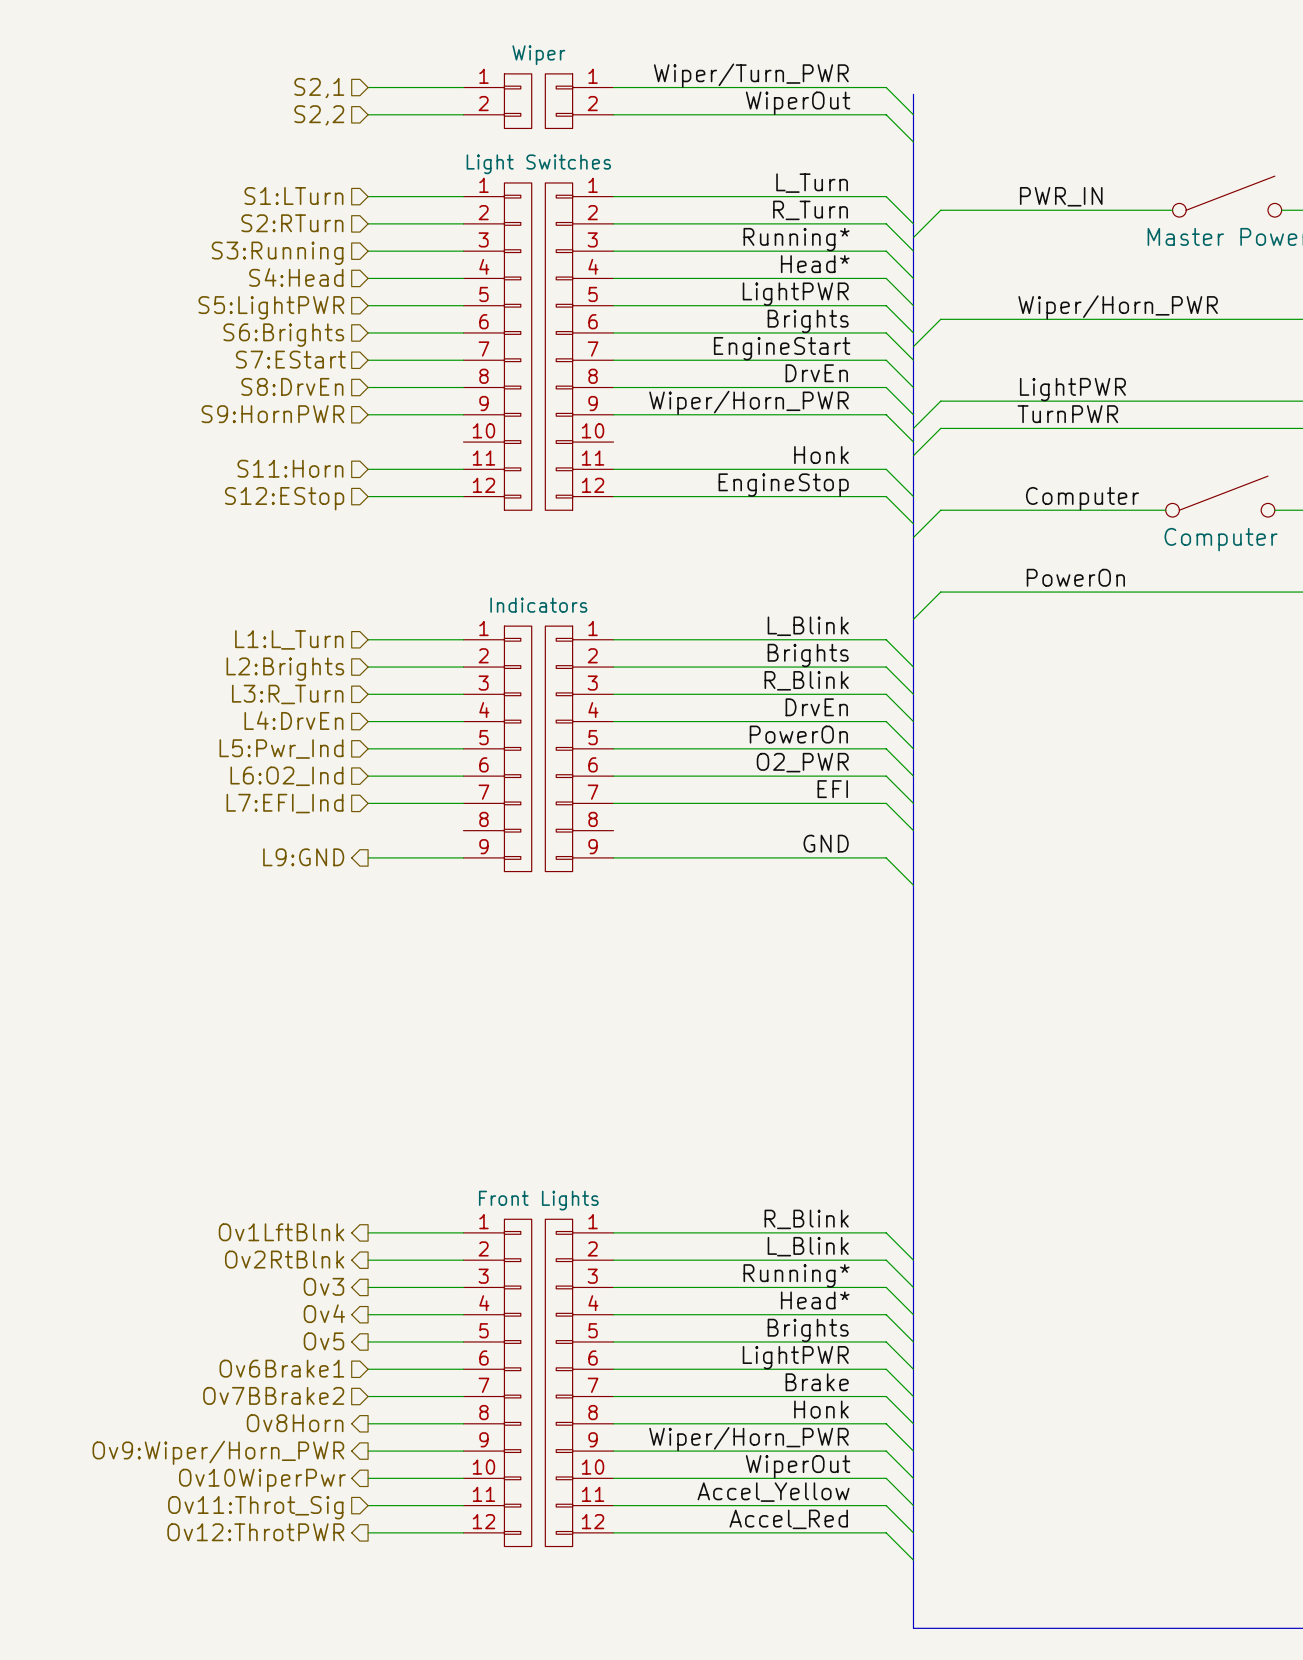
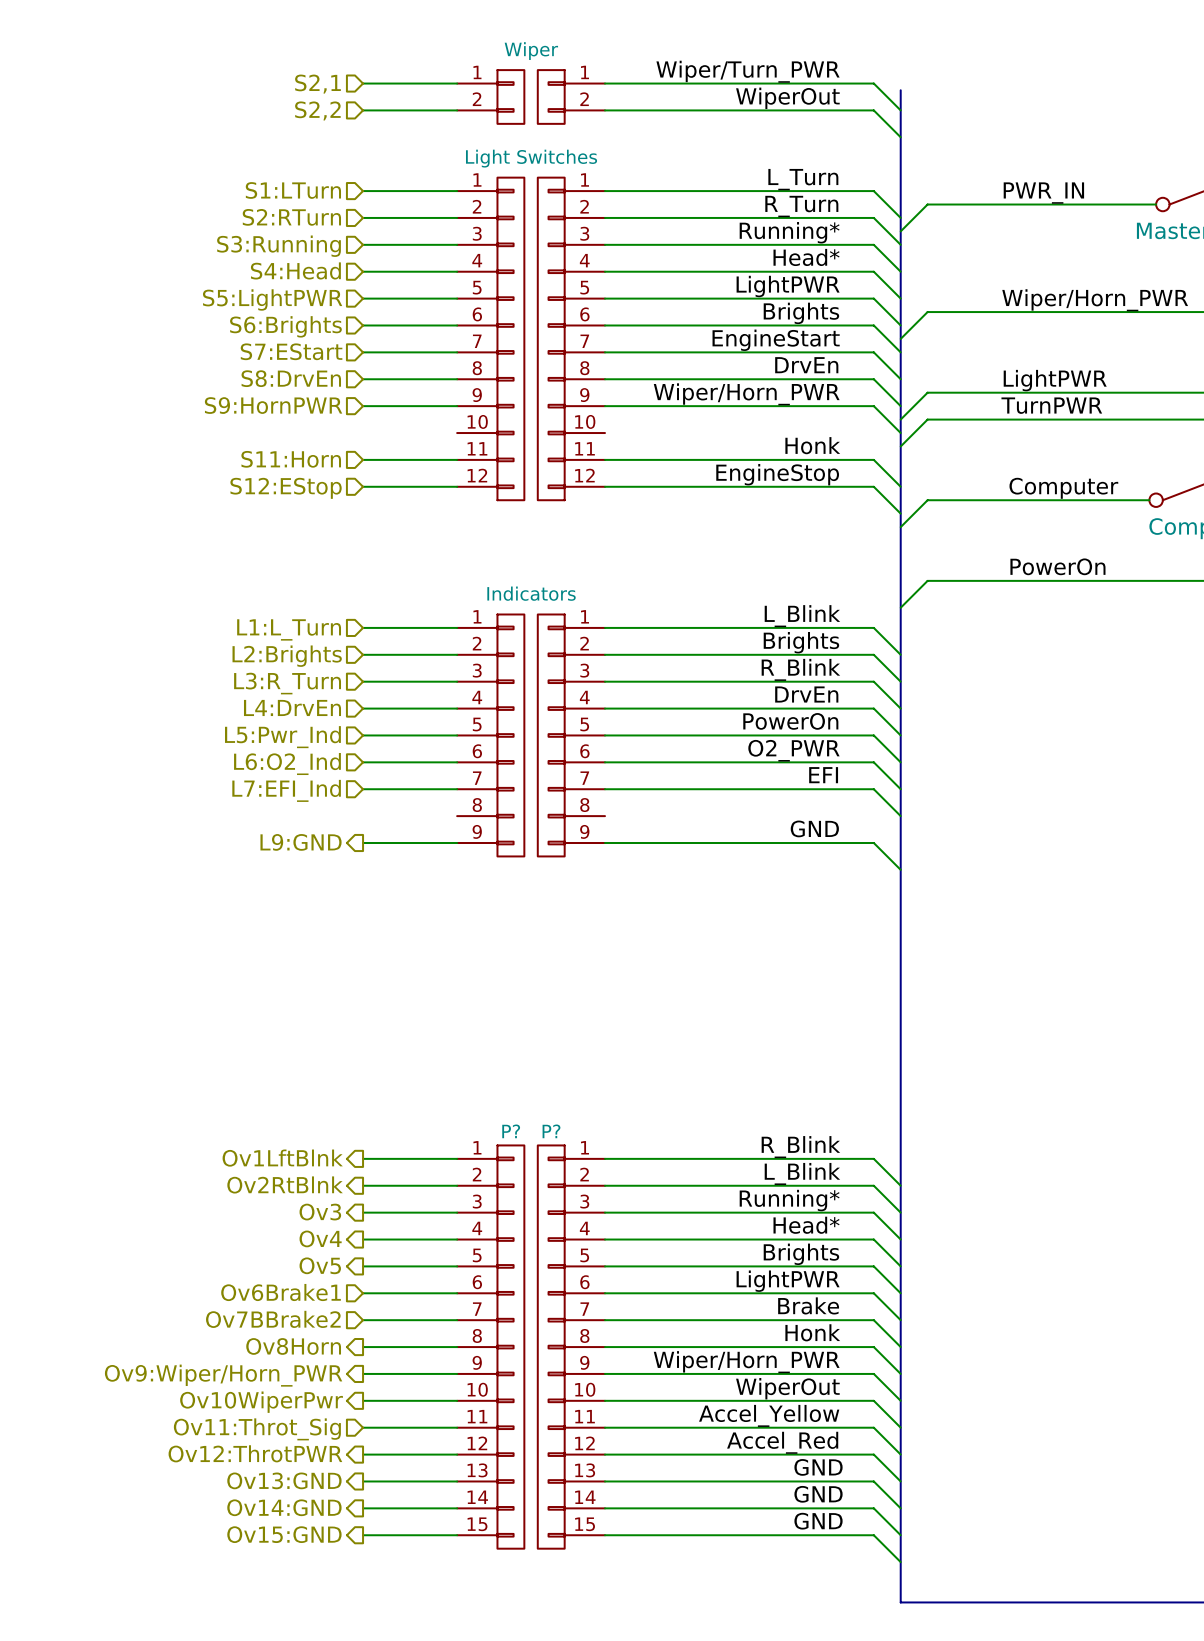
label: none -> R_Blink (800, 1147)
hierarchical label: none -> Ov1LftBlnk (282, 1158)
wire: none -> (363, 1158) (457, 1158)
wire: none -> (605, 1158) (873, 1158) (900, 1185)
label: none -> L_Blink (802, 1173)
hierarchical label: none -> Ov2RtBlnk (285, 1184)
wire: none -> (363, 1185) (457, 1185)
wire: none -> (605, 1185) (873, 1185) (900, 1212)
label: R_Blink (806, 1219) -> Running* (789, 1200)
hierarchical label: Ov1LftBlnk (281, 1232) -> Ov3 (320, 1212)
label: L_Blink (808, 1246) -> Head* (806, 1225)
hierarchical label: Ov2RtBlnk (284, 1259) -> Ov4 (320, 1238)
label: Running* (796, 1275) -> Brights (801, 1254)
hierarchical label: Ov3 (323, 1286) -> Ov5 (320, 1265)
label: Head* (815, 1300) -> LightPWR (788, 1281)
hierarchical label shape: output (324, 1313) -> input (281, 1292)
hierarchical label: Ov4 (324, 1313) -> Ov6Brake1 (281, 1292)
label: Brights (808, 1330) -> Brake (808, 1305)
hierarchical label shape: output (323, 1341) -> input (273, 1319)
hierarchical label: Ov5 (323, 1341) -> Ov7BBrake2 (273, 1319)
label: LightPWR (795, 1357) -> Honk (812, 1332)
hierarchical label shape: input (281, 1368) -> output (293, 1346)
hierarchical label: Ov6Brake1 (281, 1368) -> Ov8Horn (293, 1346)
P?: none -> (490, 1347)
P?: none -> (571, 1347)
part: Front Lights (497, 1382) -> none
part: (579, 1382) -> none
label: Brake (817, 1382) -> Wiper/Horn_PWR (746, 1362)
hierarchical label shape: input (273, 1395) -> output (223, 1375)
hierarchical label: Ov7BBrake2 (273, 1395) -> Ov9:Wiper/Horn_PWR (223, 1375)
label: Honk (821, 1409) -> WiperOut (787, 1388)
hierarchical label: Ov8Horn (295, 1423) -> Ov10WiperPwr (261, 1402)
label: Wiper/Horn_PWR (748, 1439) -> Accel_Yellow (769, 1415)
hierarchical label shape: output (218, 1452) -> input (257, 1429)
hierarchical label: Ov9:Wiper/Horn_PWR (218, 1452) -> Ov11:Throt_Sig (257, 1429)
label: WiperOut (798, 1466) -> Accel_Red (782, 1442)
hierarchical label: Ov10WiperPwr (262, 1480) -> Ov12:ThrotPWR (255, 1453)
label: none -> GND (818, 1467)
label: Accel_Yellow (773, 1492) -> none
hierarchical label shape: input (255, 1507) -> output (284, 1480)
hierarchical label: Ov11:Throt_Sig (255, 1507) -> Ov13:GND (284, 1480)
label: none -> GND (818, 1494)
label: Accel_Red (788, 1519) -> none
hierarchical label: Ov12:ThrotPWR (255, 1532) -> Ov14:GND (284, 1507)
label: none -> GND (818, 1521)
hierarchical label: none -> Ov15:GND (284, 1534)
wire: none -> (363, 1535) (457, 1535)
wire: none -> (605, 1535) (873, 1535) (900, 1562)

